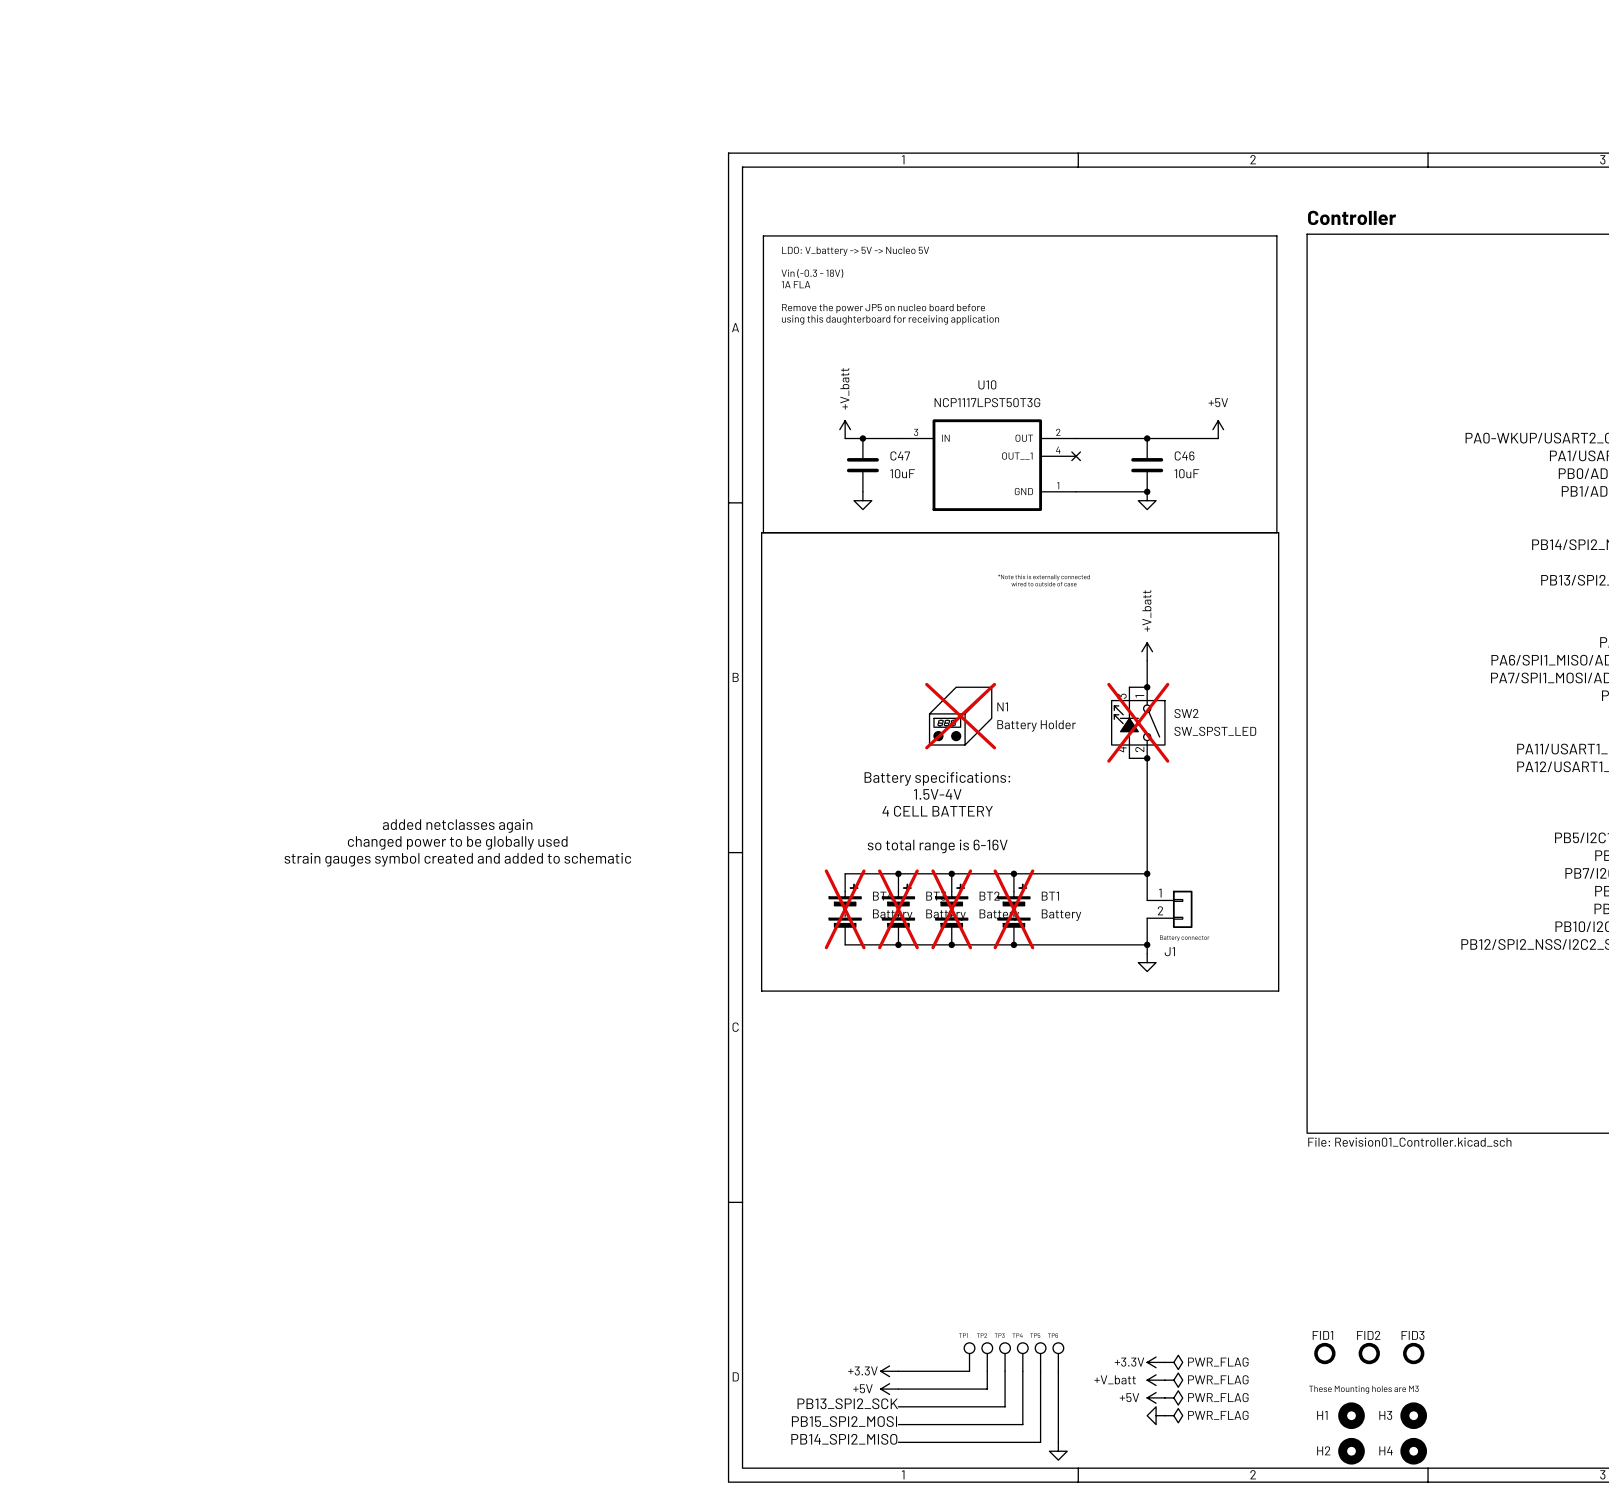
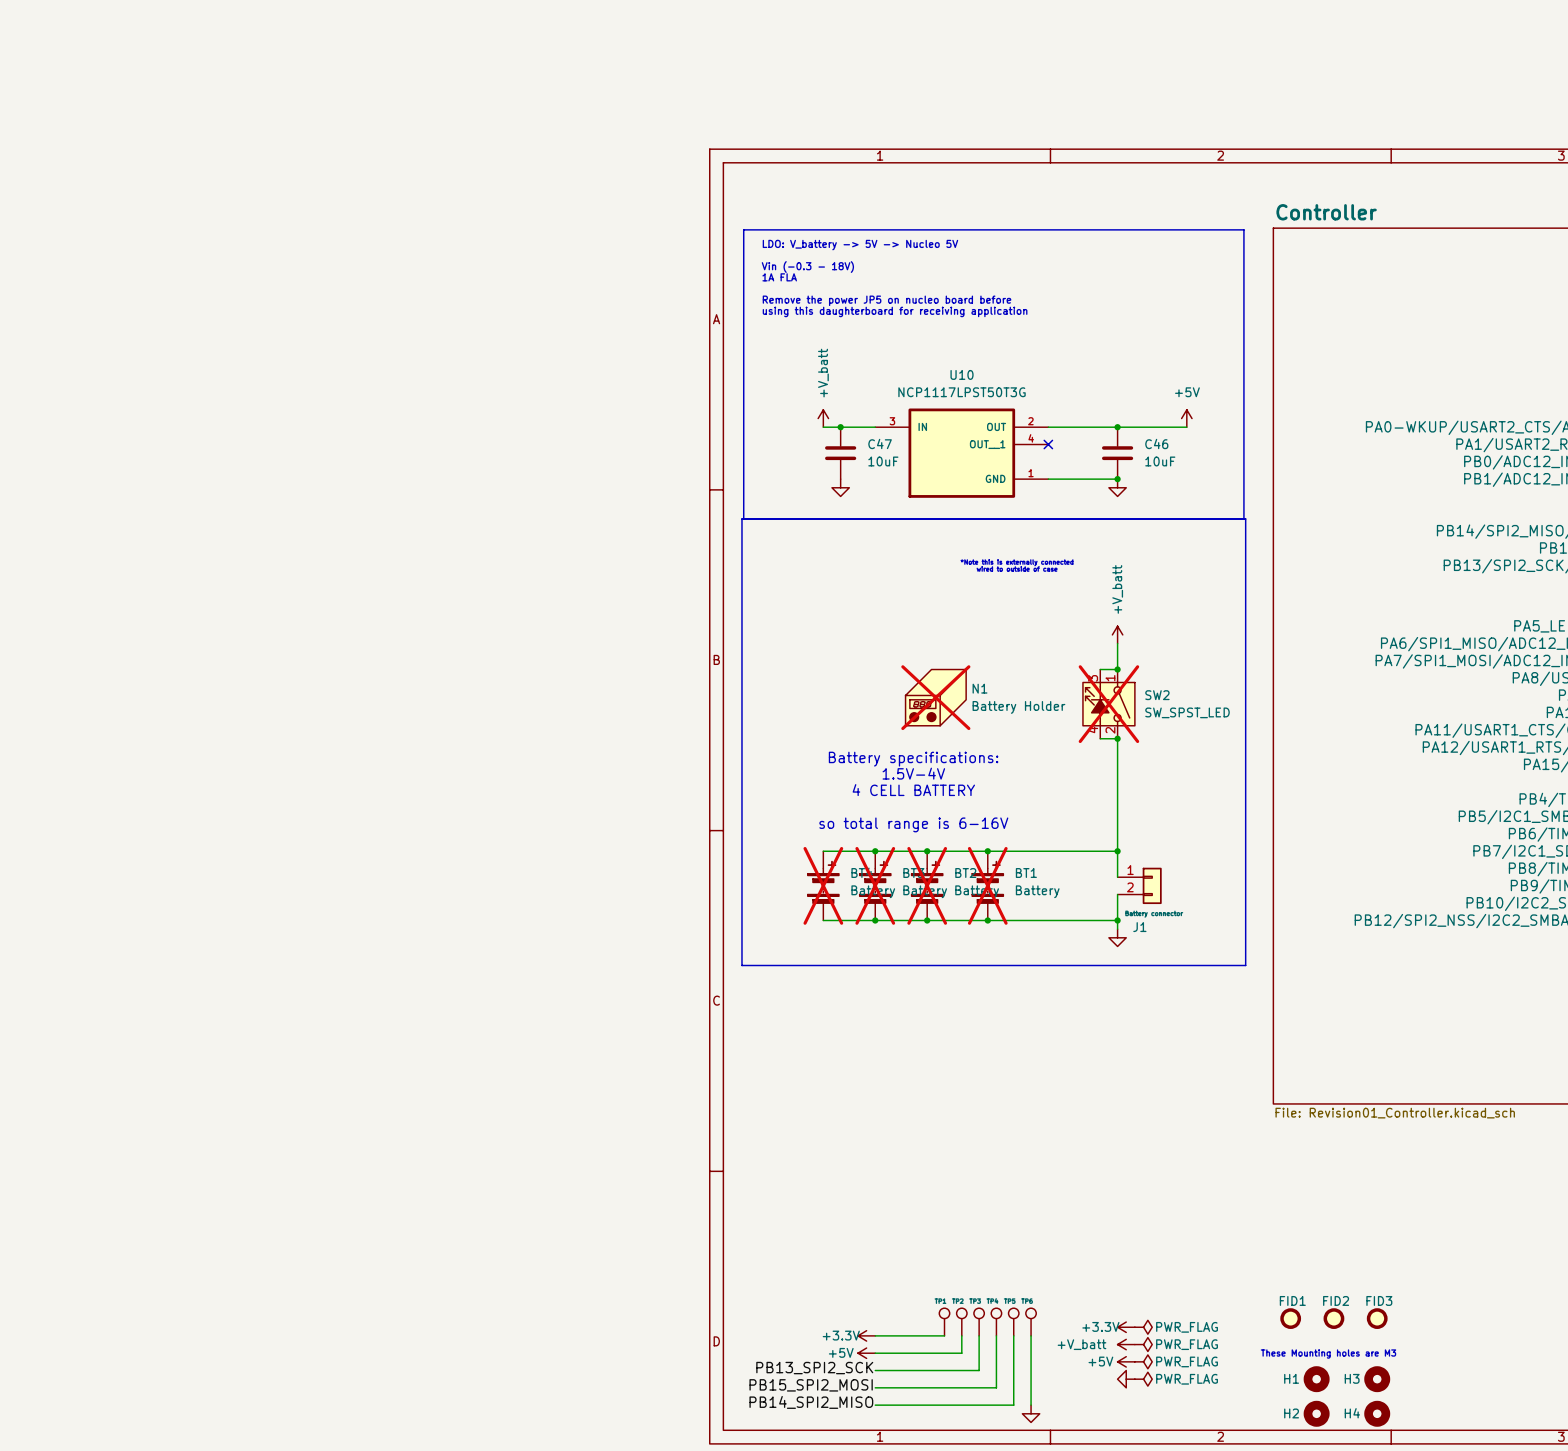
text: added netclasses again (457, 826) -> none
text: changed power to be globally used (457, 842) -> none
text: strain gauges symbol created and added to schematic (457, 859) -> none

